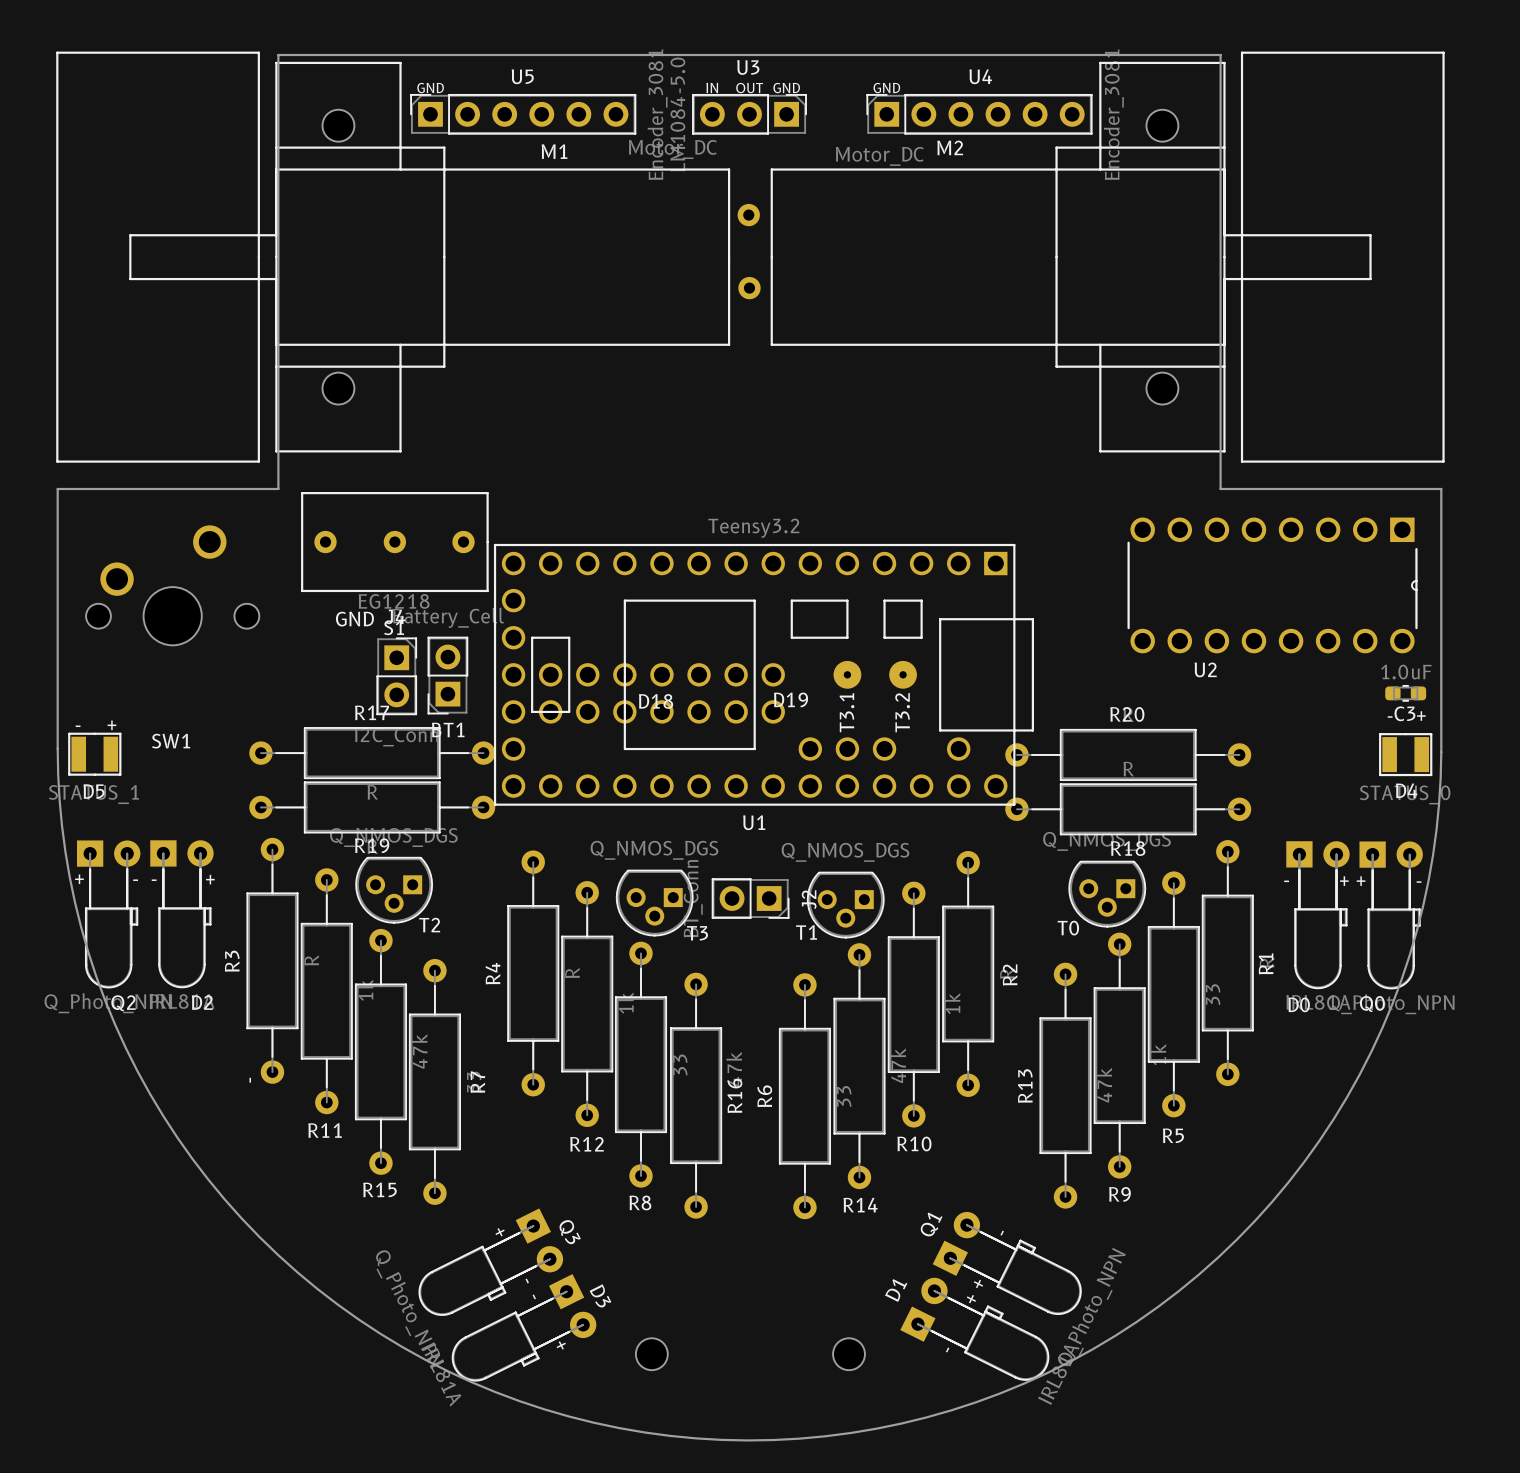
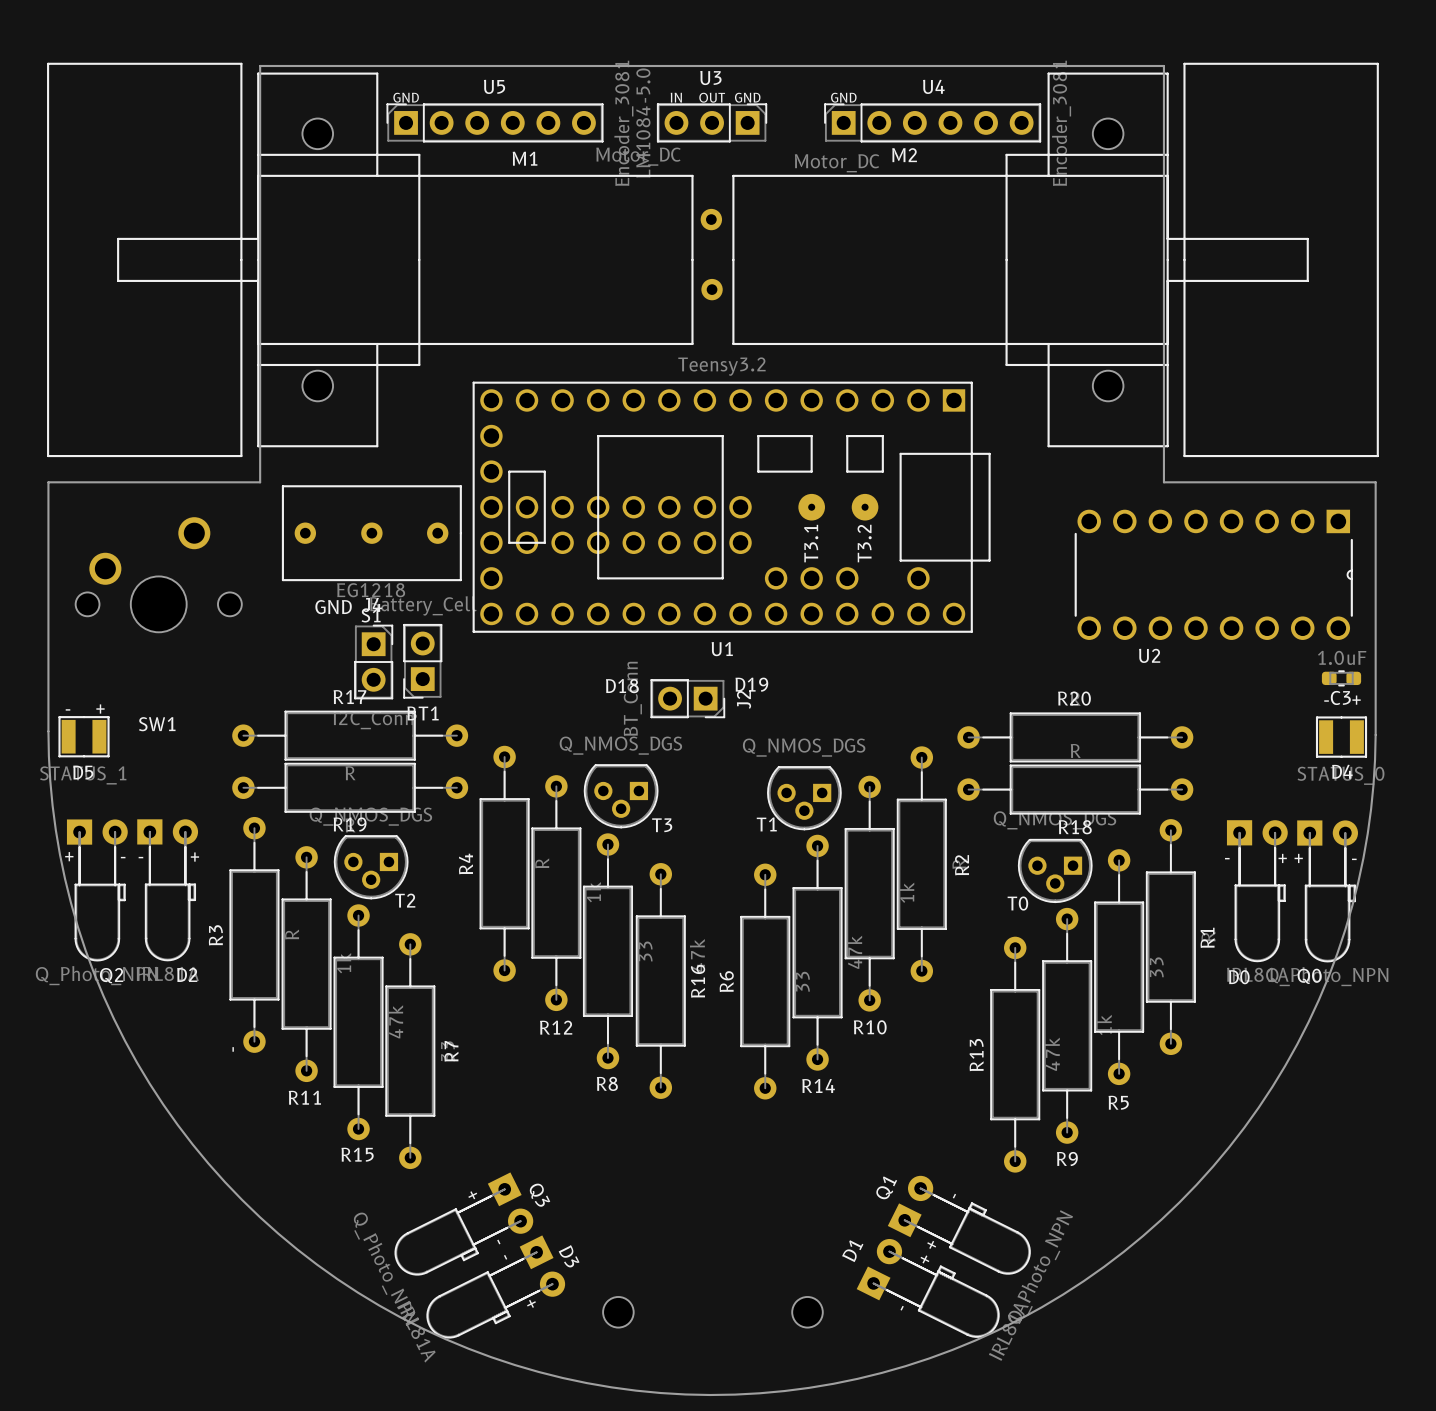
U1 position: (763, 674) -> (731, 507)
J2 position: (750, 898) -> (687, 698)
T3 position: (654, 903) -> (621, 796)
T1 position: (845, 905) -> (804, 798)
R4 position: (533, 973) -> (504, 863)
R2 position: (968, 973) -> (921, 864)
R12 position: (587, 1004) -> (556, 893)
R10 position: (913, 1004) -> (869, 893)
R8 position: (641, 1064) -> (607, 951)
R14 position: (859, 1066) -> (817, 952)
R16 position: (696, 1095) -> (660, 981)
R6 position: (804, 1096) -> (765, 981)

